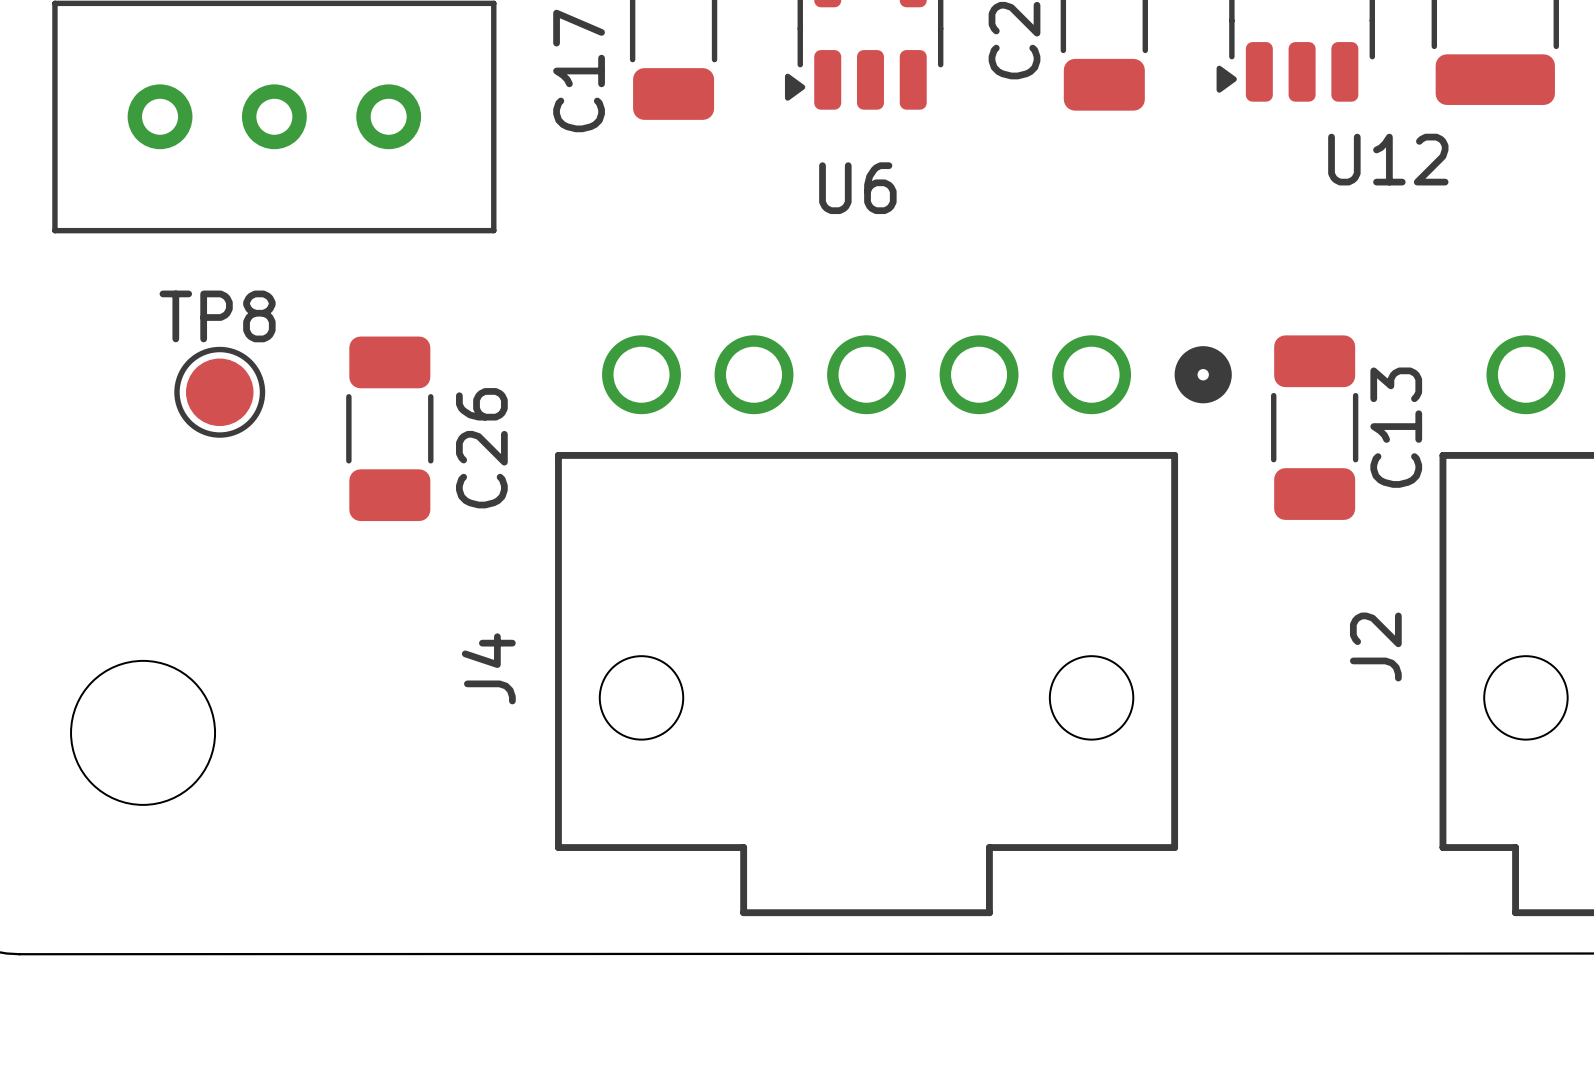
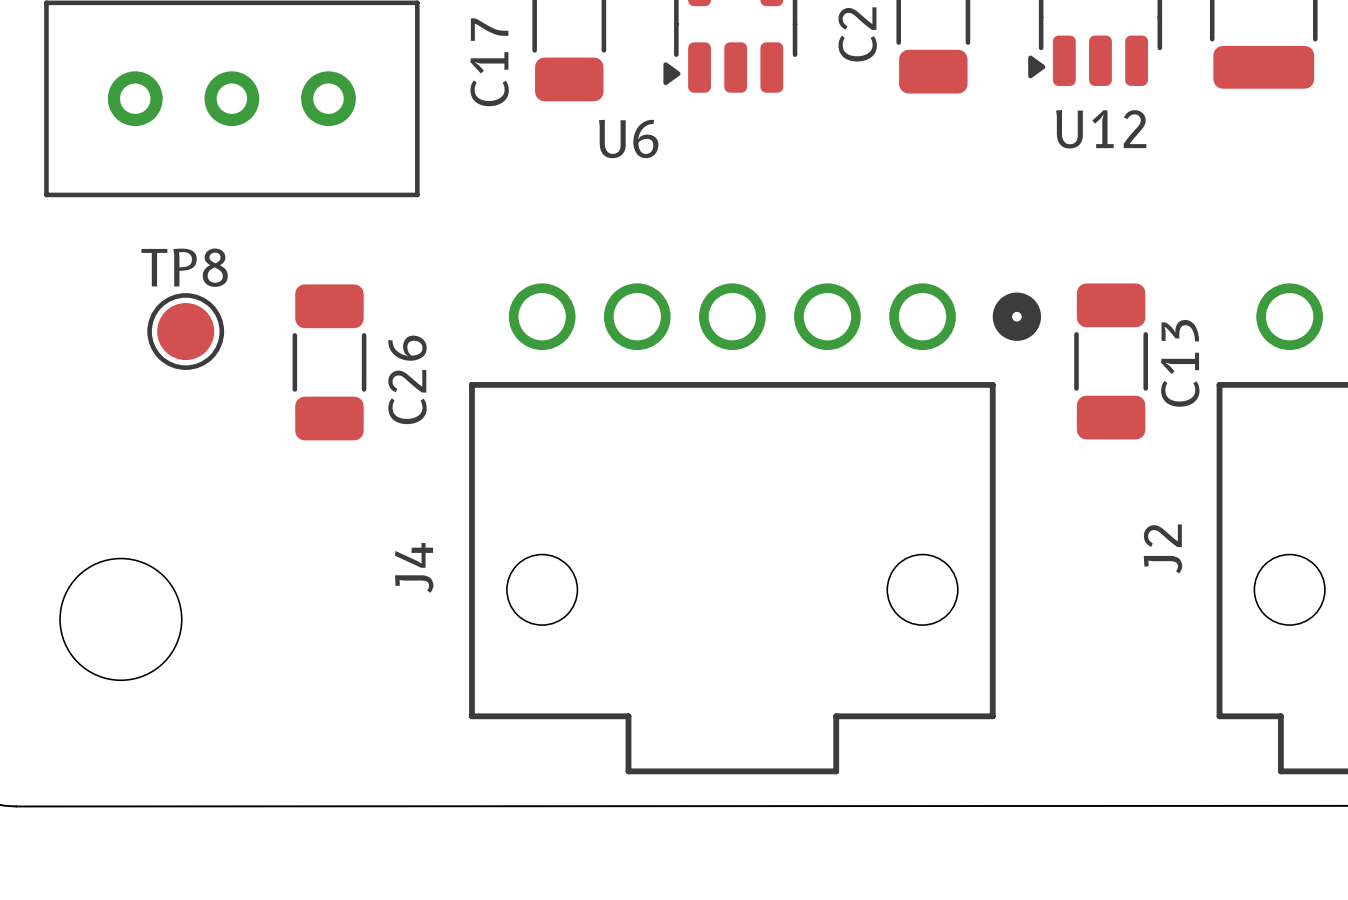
U12 name position: U12 (1388, 159) -> U12 (1101, 129)
U6 name position: U6 (857, 188) -> U6 (628, 138)

